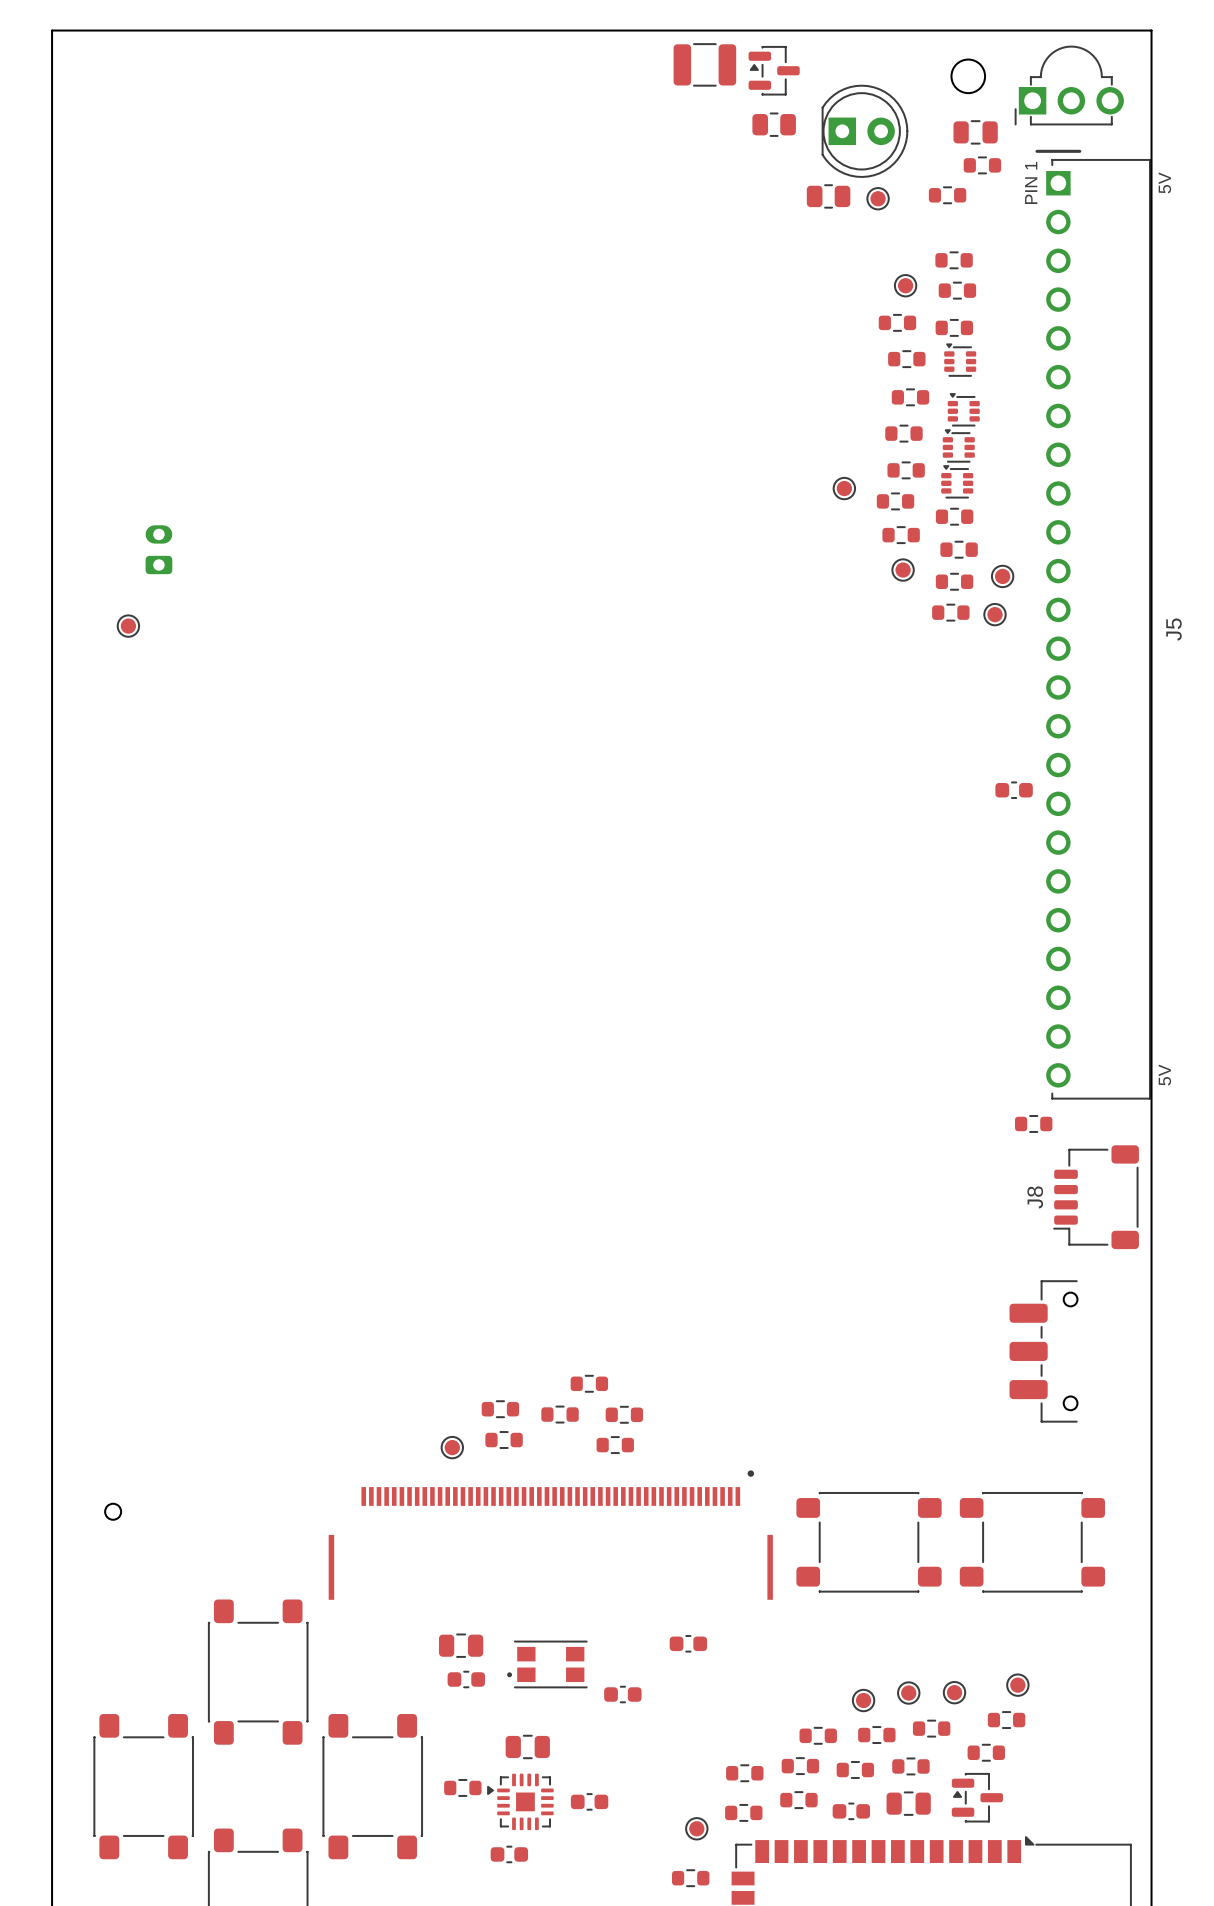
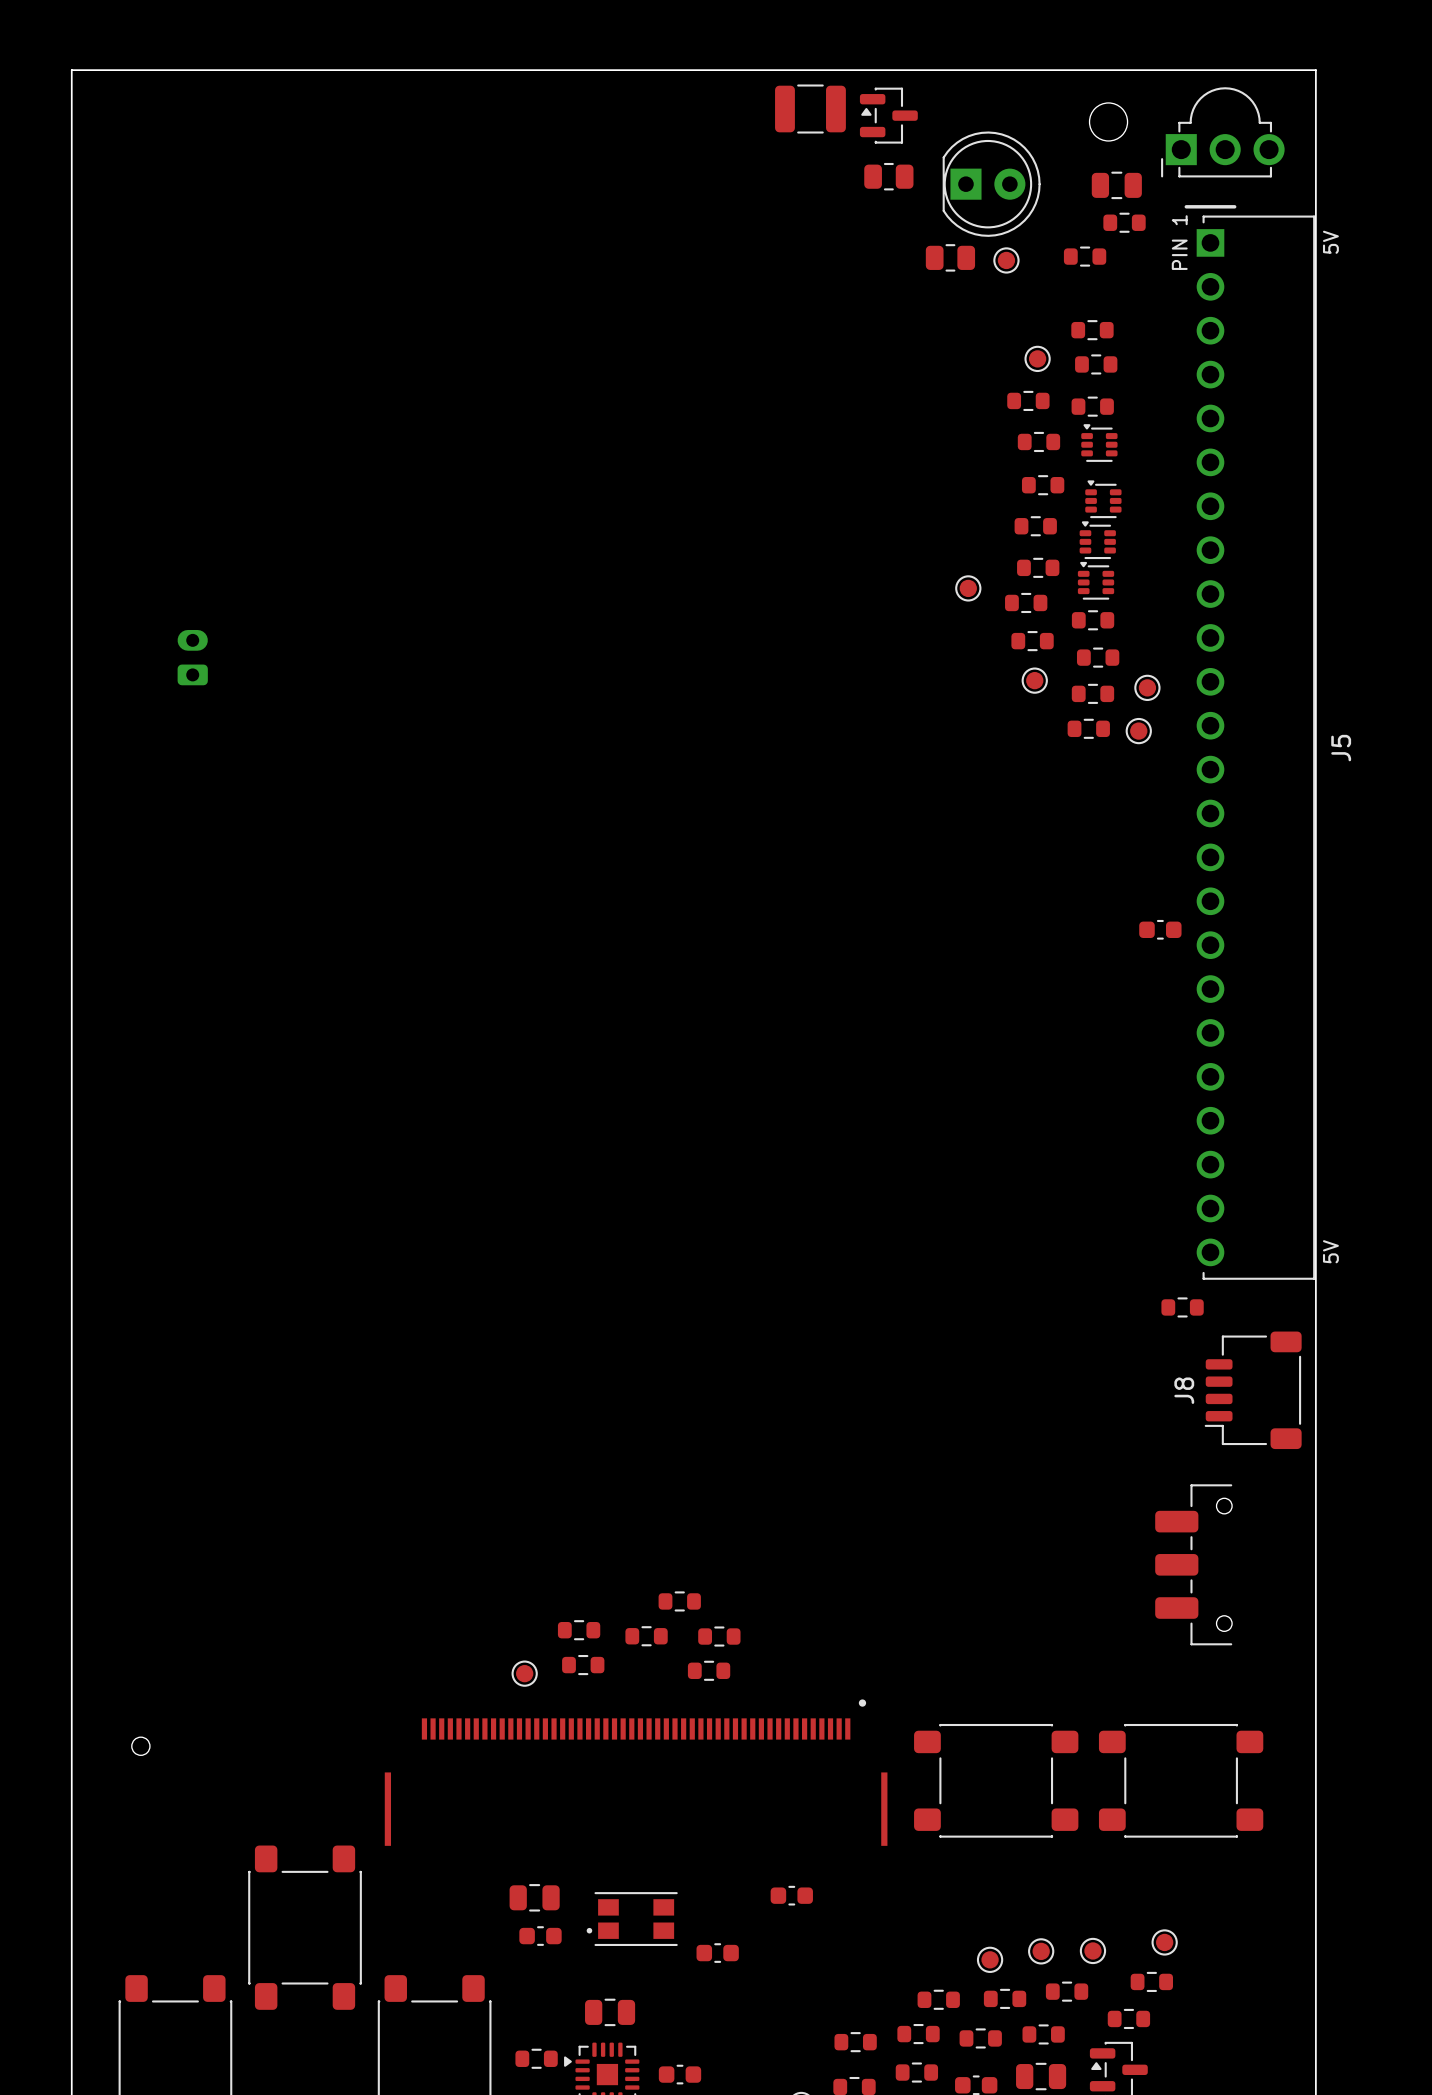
part: (128, 626) -> none

